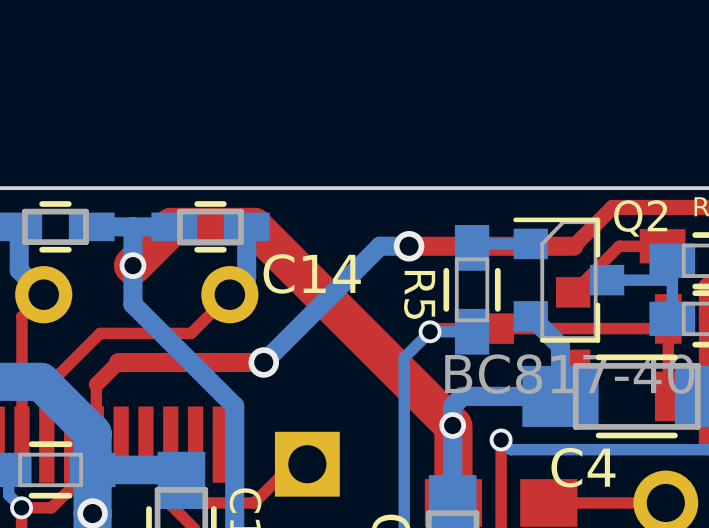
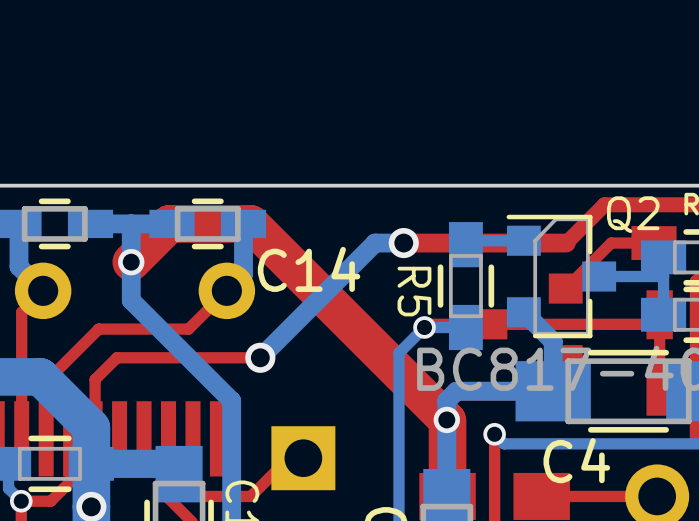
top track width: thick (263, 362) (118, 362) (96, 384) -> thin (260, 357) (116, 357) (95, 379)

